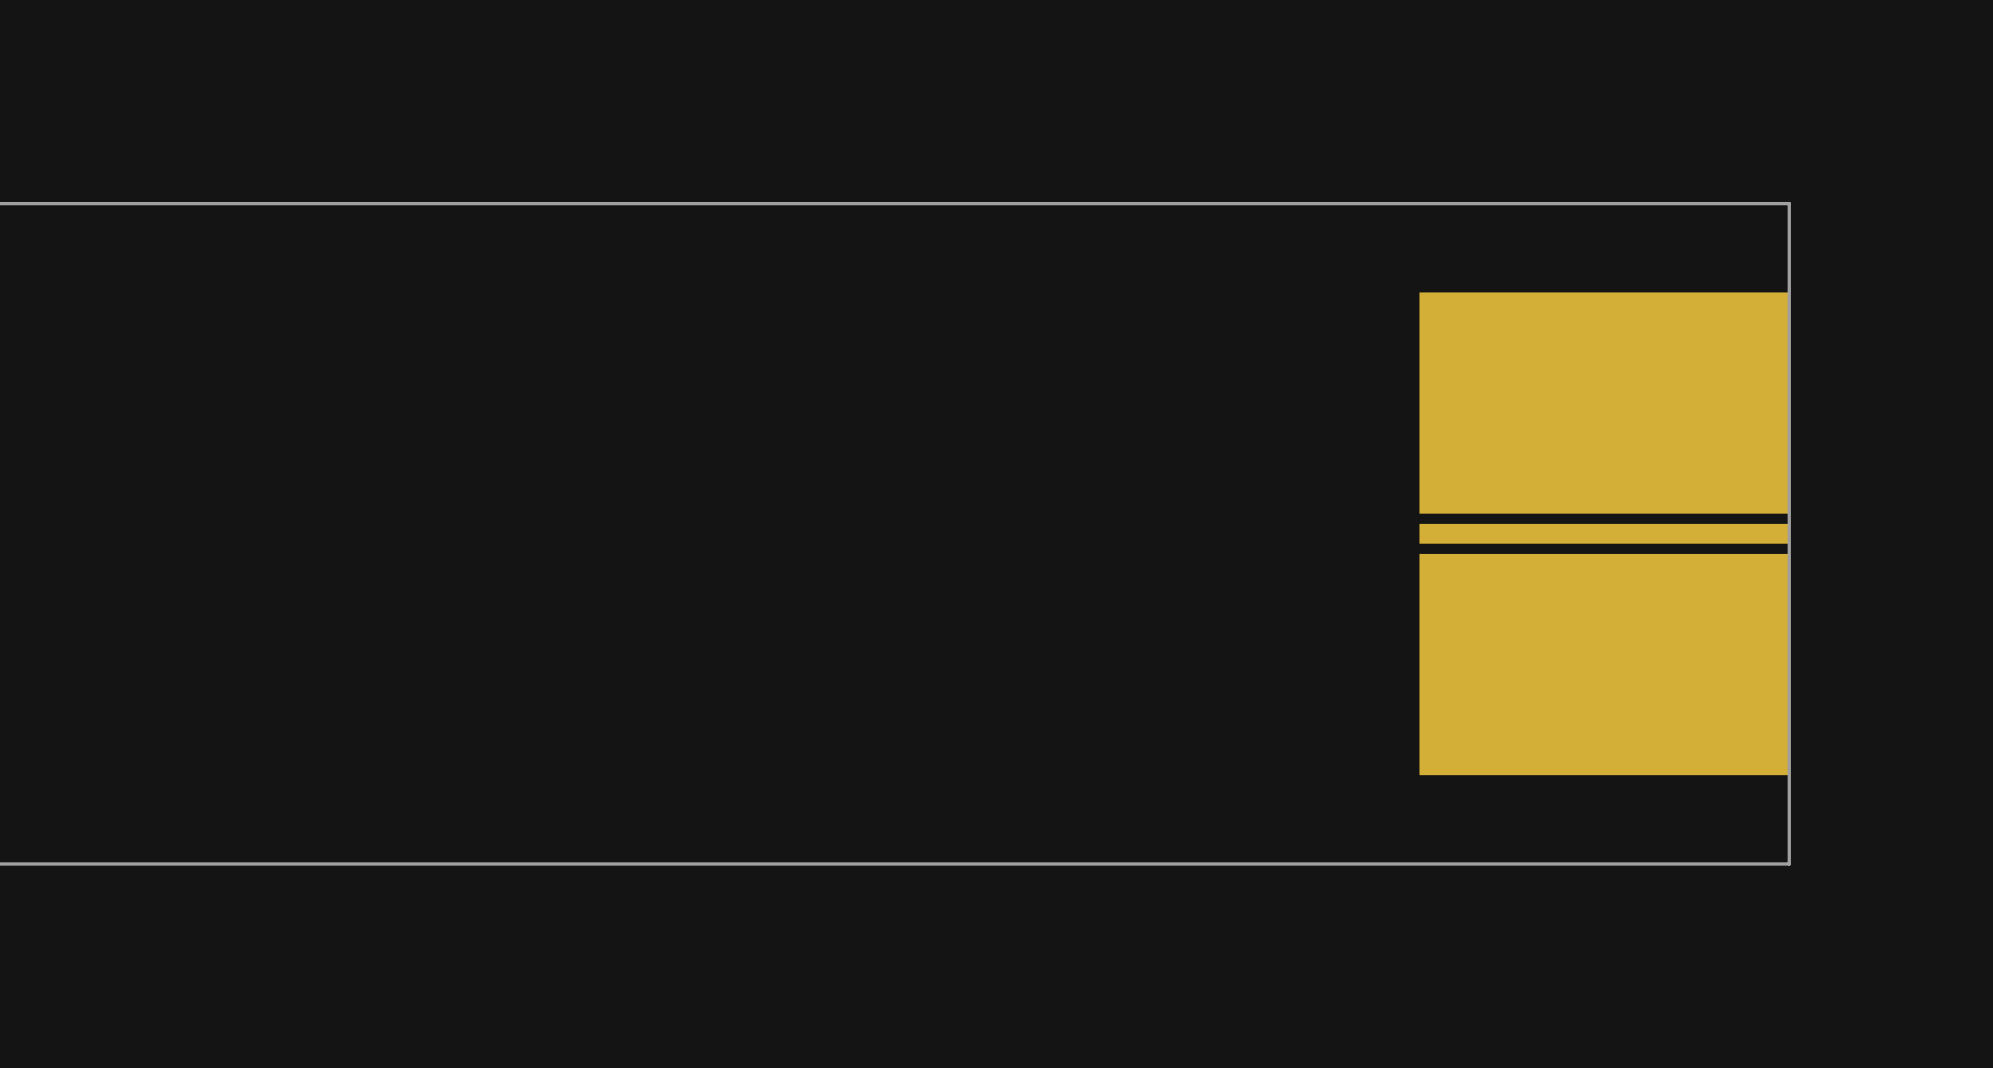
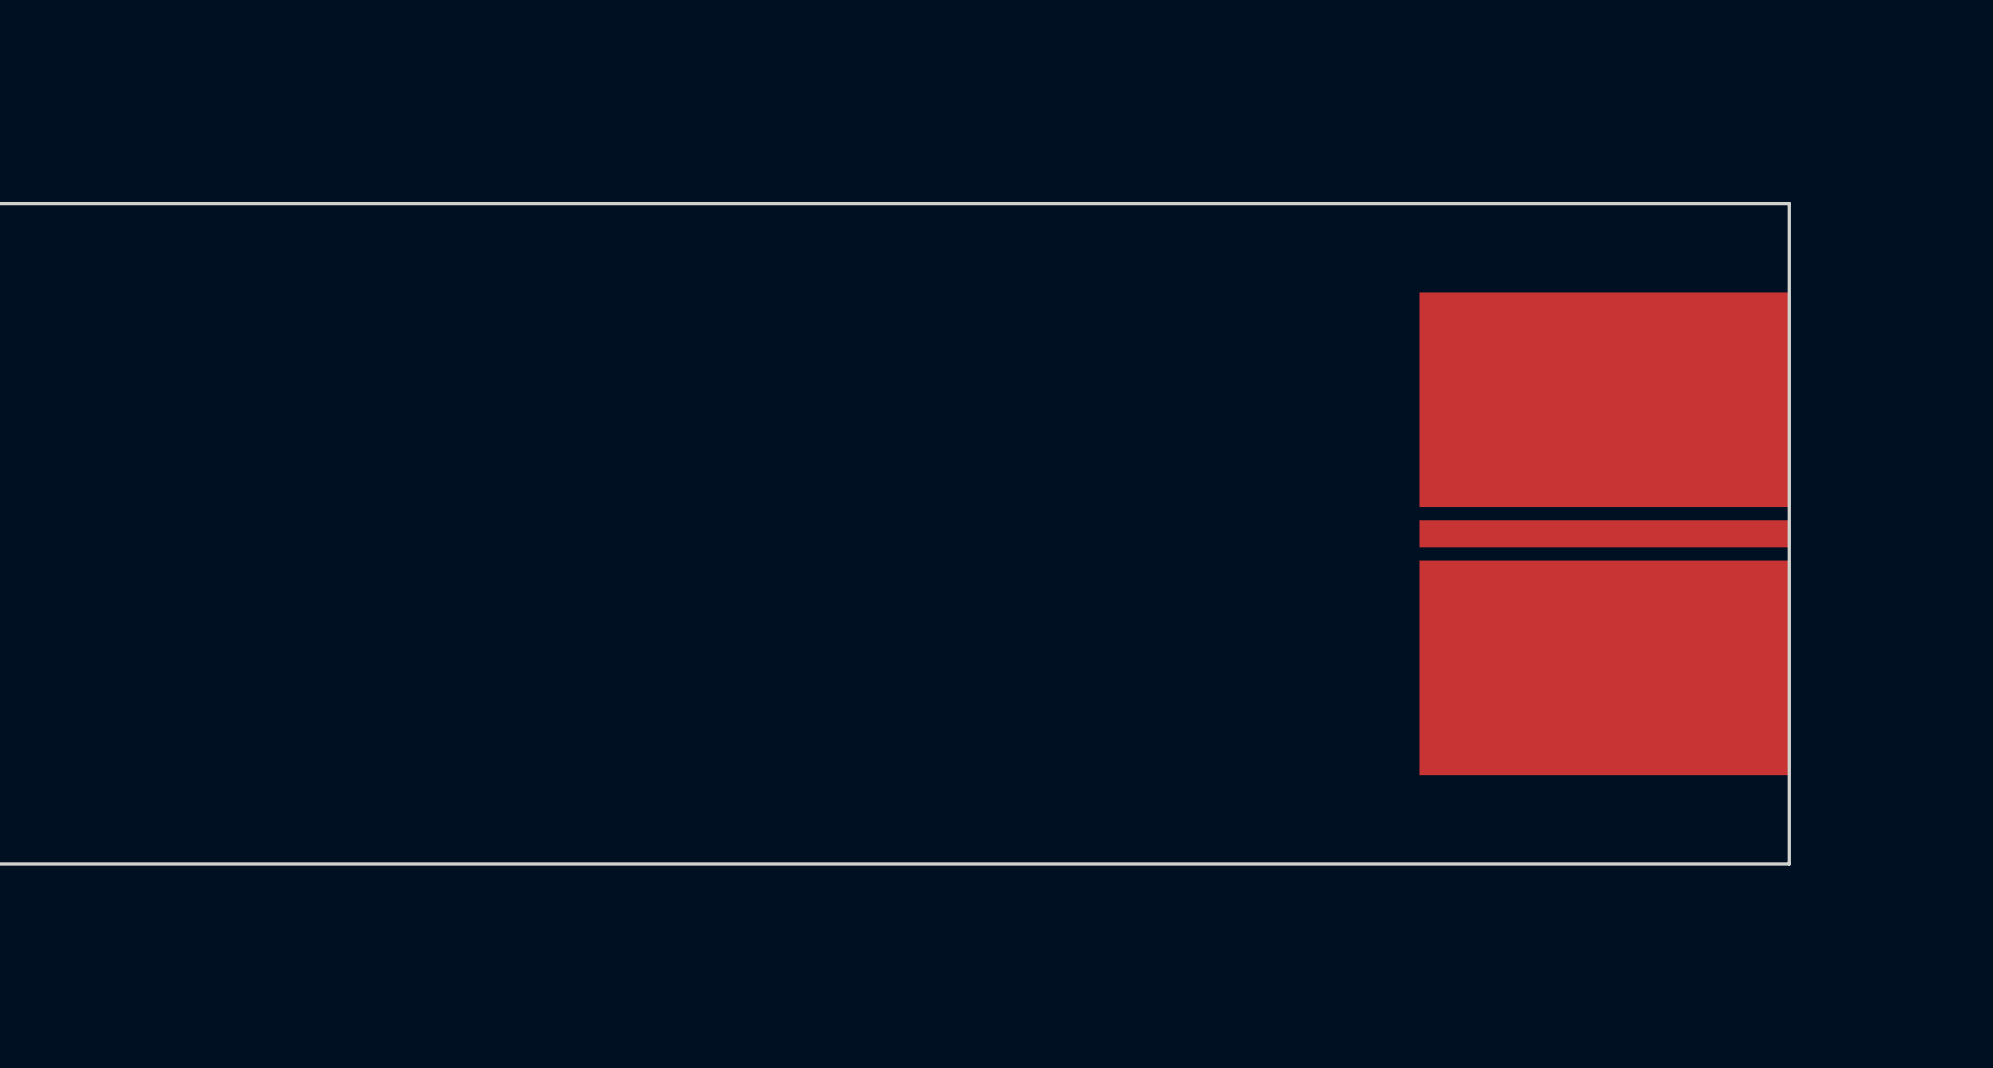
part footprint: [1419, 292, 1790, 776] -> [1419, 292, 1790, 776]

